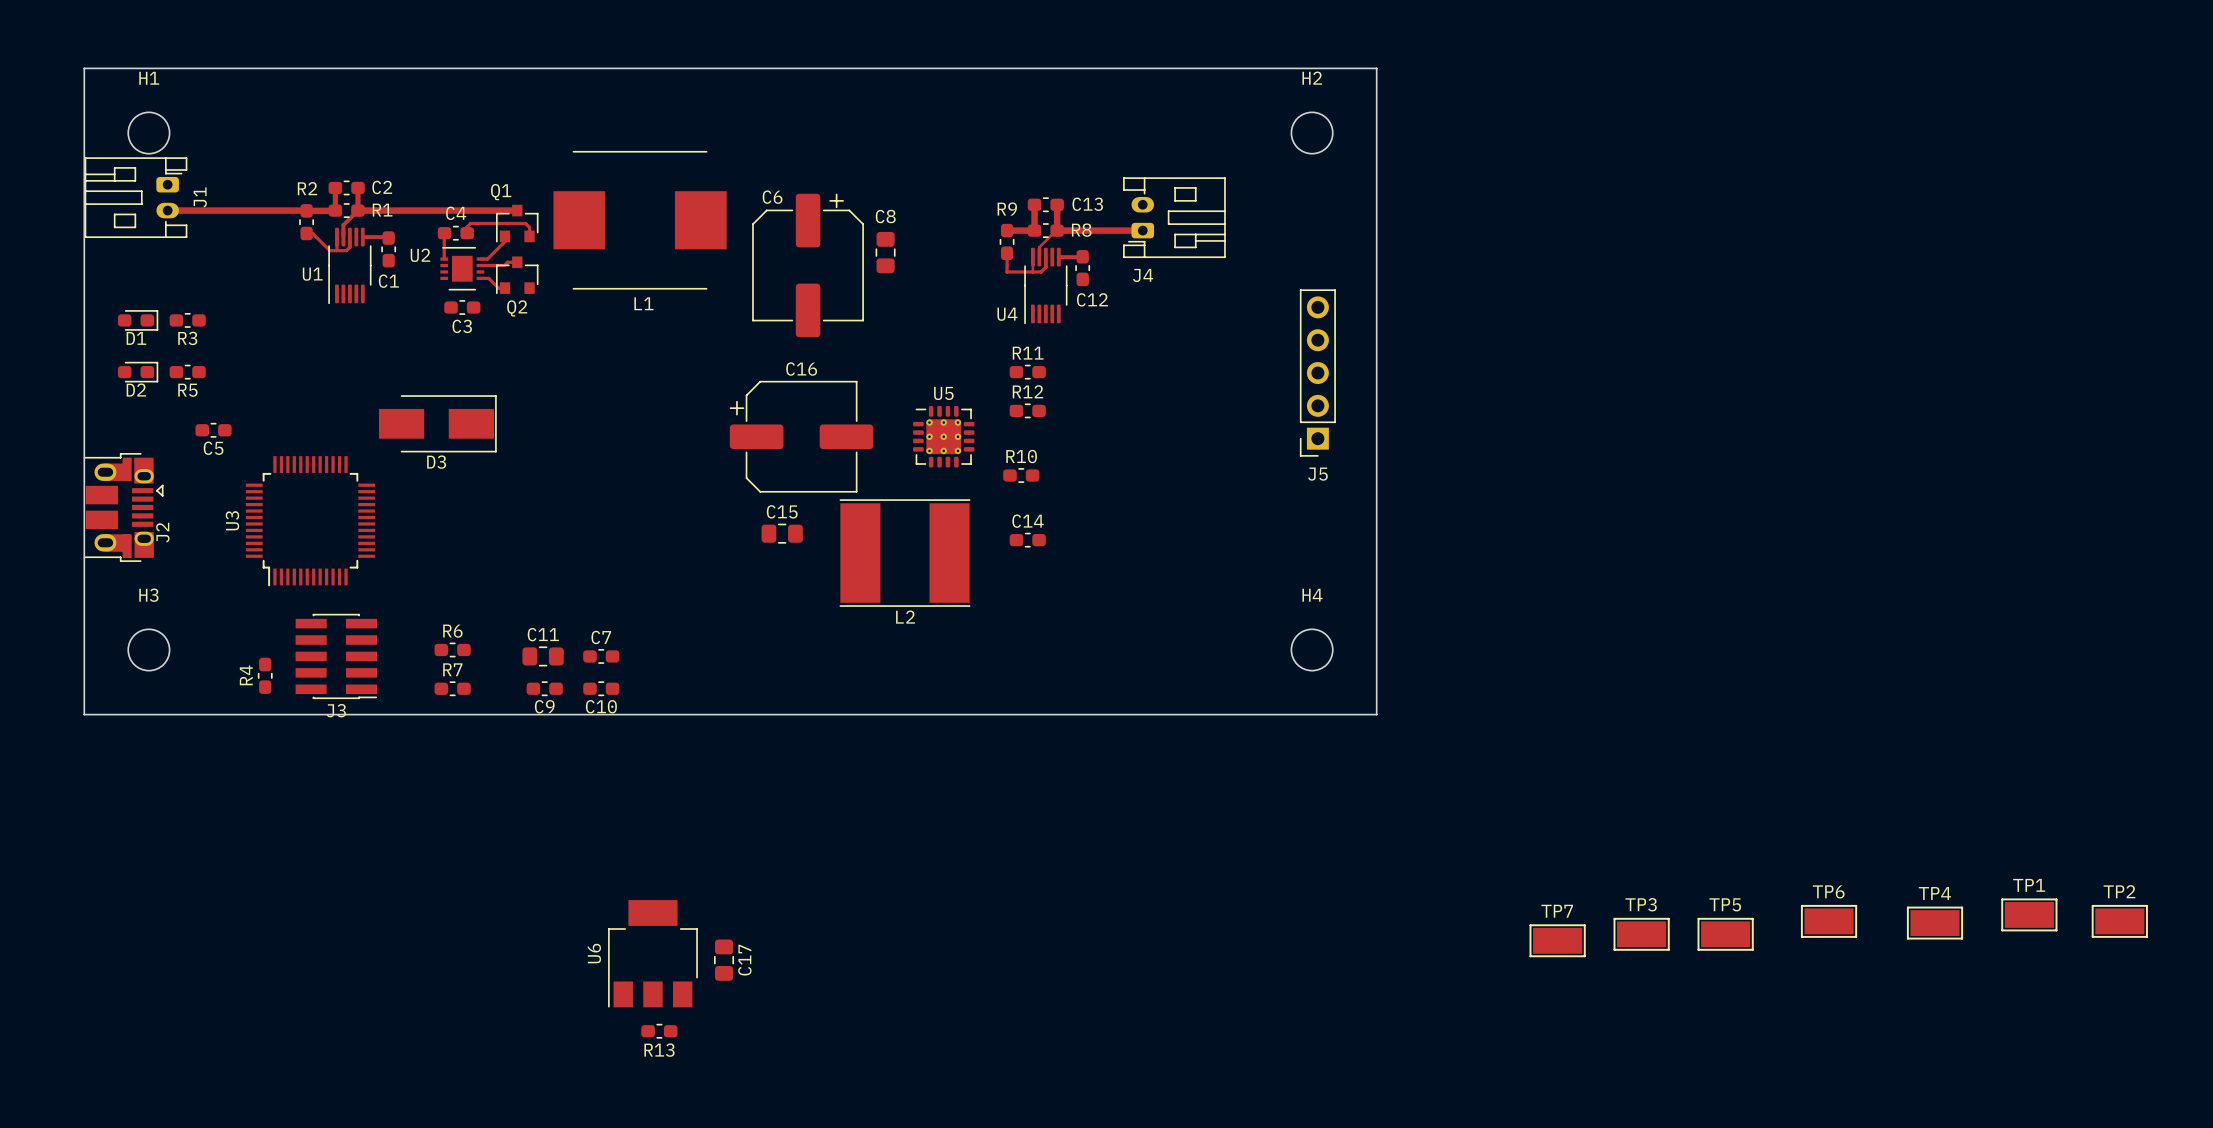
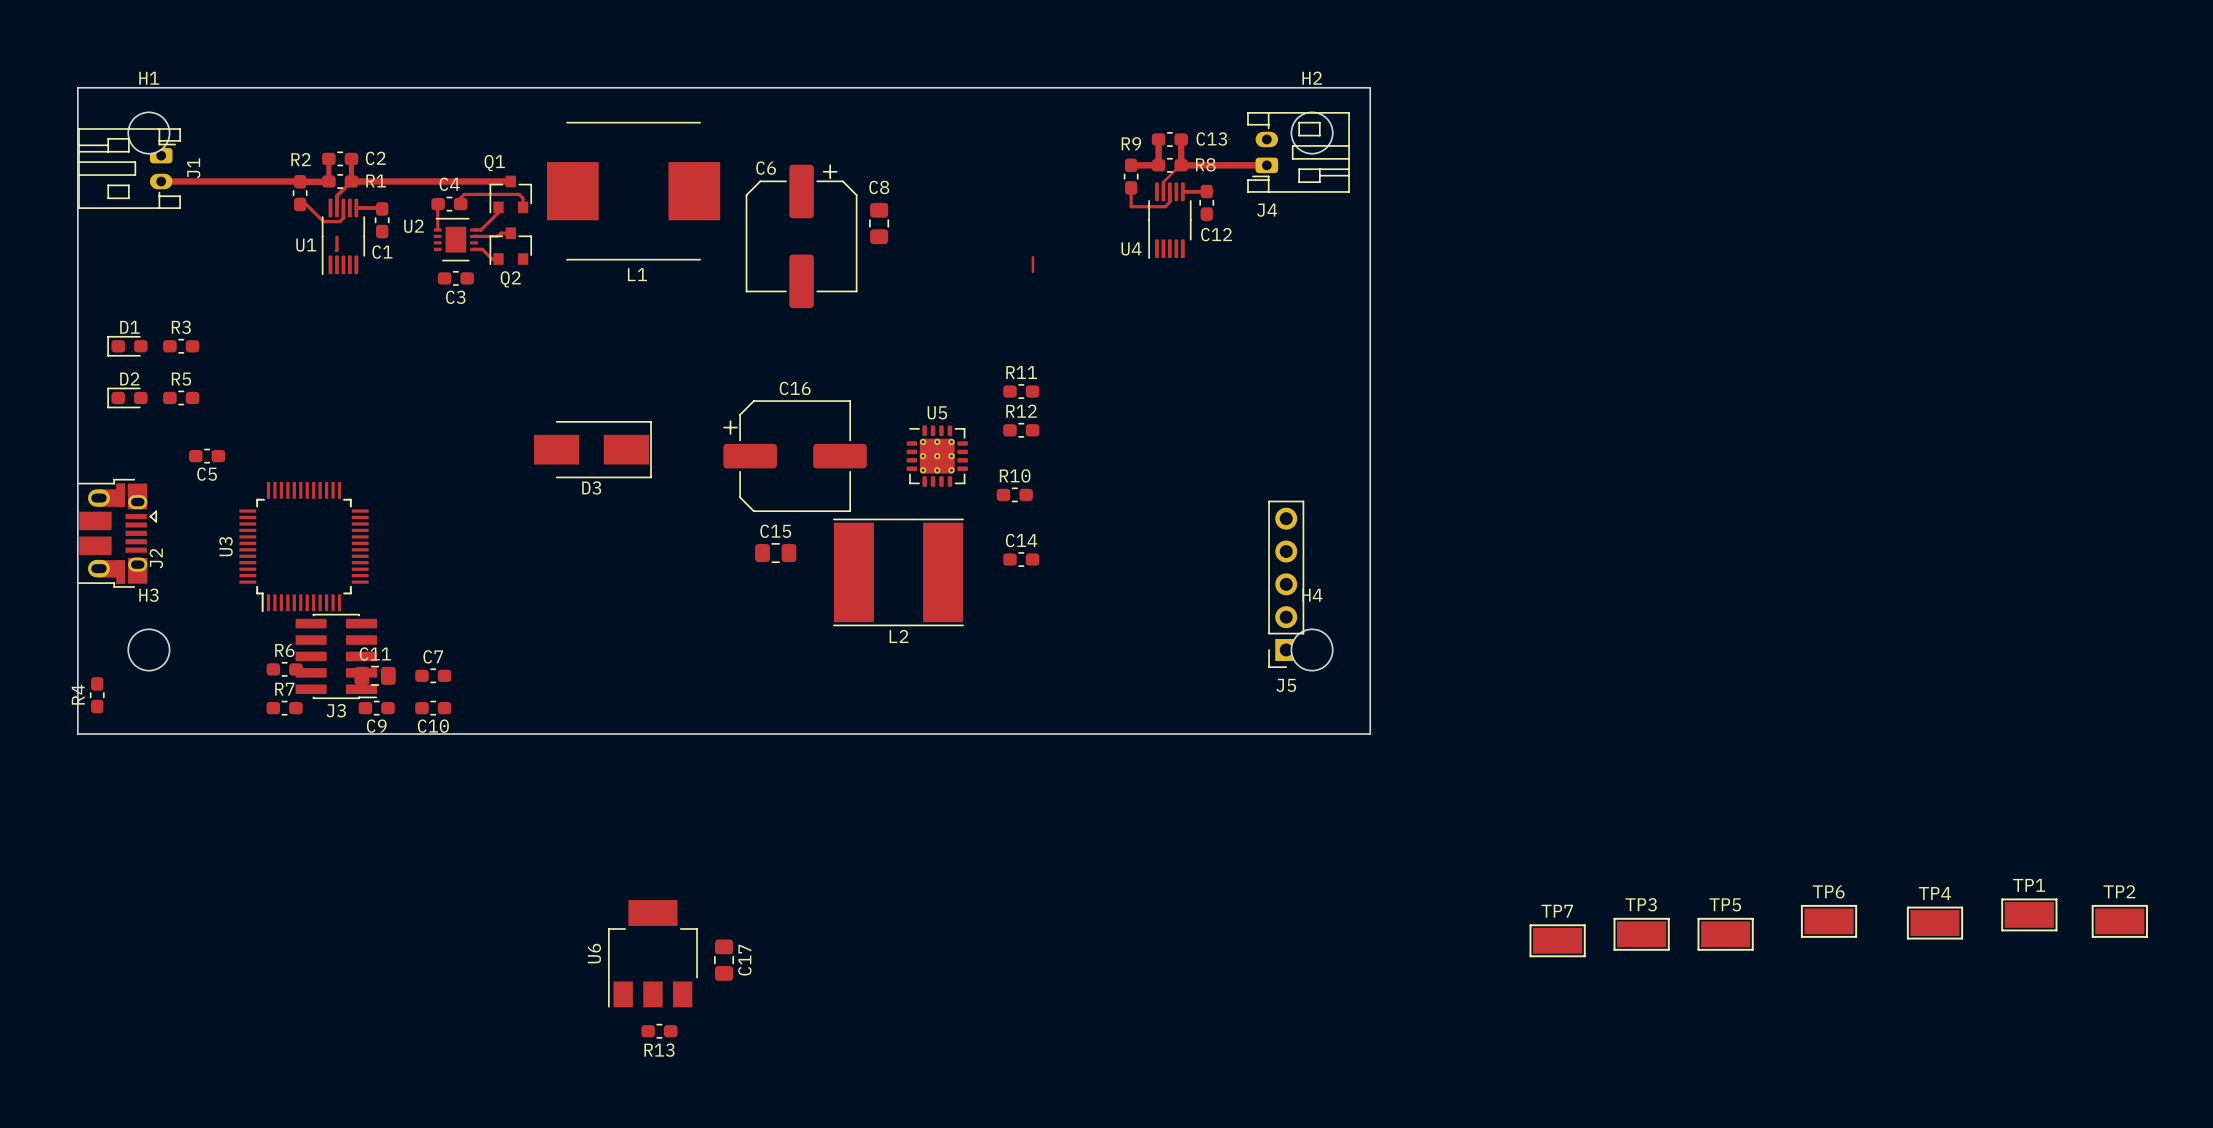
board edge: (84, 68) (1376, 68) (1376, 714) (84, 714) (84, 68) -> (77, 87) (1370, 87) (1370, 733) (77, 733) (77, 87)
track: (335, 187) (335, 210) (167, 210) -> (328, 158) (328, 181) (161, 181)
C2 position: (346, 187) -> (340, 158)
track: (357, 187) (357, 210) -> (351, 158) (351, 181)
J1 position: (135, 197) -> (129, 168)
track: (1034, 204) (1034, 230) (1007, 230) -> (1158, 139) (1158, 165) (1131, 165)
C13 position: (1045, 204) -> (1169, 139)
track: (1057, 204) (1057, 230) -> (1181, 139) (1181, 165)
R1 position: (346, 210) -> (340, 181)
track: (357, 210) (343, 225) (343, 237) -> (351, 181) (336, 196) (336, 207)
track: (357, 210) (517, 210) -> (351, 181) (510, 181)
J4 position: (1174, 217) -> (1298, 152)
L1 position: (640, 220) -> (633, 191)
R2 position: (306, 222) -> (300, 193)
Q1 position: (517, 223) -> (510, 194)
R8 position: (1045, 230) -> (1169, 165)
track: (1057, 230) (1039, 247) (1039, 257) -> (1181, 165) (1163, 182) (1163, 191)
track: (1057, 230) (1142, 230) -> (1181, 165) (1266, 165)
track: (306, 233) (312, 233) (329, 250) (346, 250) (349, 247) (349, 237) -> (300, 204) (306, 204) (323, 221) (340, 221) (343, 218) (343, 207)
track: (444, 233) (444, 259) -> (438, 204) (437, 229)
C4 position: (455, 233) -> (449, 204)
track: (467, 233) (467, 227) (470, 223) (525, 223) (529, 227) (529, 236) -> (460, 204) (460, 197) (464, 194) (519, 194) (523, 198) (523, 207)
track: (504, 236) (504, 241) (487, 259) (480, 259) -> (498, 207) (498, 212) (481, 229) (473, 229)
track: (362, 237) (388, 238) -> (356, 207) (382, 208)
R9 position: (1007, 241) -> (1131, 176)
C1 position: (388, 249) -> (382, 220)
C8 position: (885, 252) -> (879, 223)
track: (1007, 253) (1007, 271) (1041, 271) (1045, 267) (1045, 257) -> (1131, 187) (1131, 206) (1165, 206) (1169, 202) (1169, 191)
track: (1082, 256) (1058, 257) -> (1206, 191) (1182, 191)
track: (517, 262) (507, 262) (504, 265) (480, 265) -> (510, 233) (501, 233) (497, 236) (473, 236)
U1 position: (349, 265) -> (343, 236)
C6 position: (808, 265) -> (801, 236)
U2 position: (462, 268) -> (455, 239)
C12 position: (1082, 268) -> (1206, 202)
Q2 position: (517, 275) -> (510, 246)
track: (480, 278) (488, 278) (498, 288) (504, 288) -> (473, 249) (482, 249) (492, 259) (498, 259)
U4 position: (1045, 285) -> (1169, 220)
C3 position: (462, 307) -> (455, 278)
D1 rotation: 0° (138, 320) -> 180° (127, 346)
D1 position: (138, 320) -> (127, 346)
R3 position: (187, 320) -> (181, 346)
R3 name position: R3 (187, 338) -> R3 (181, 327)
D2 rotation: 0° (138, 372) -> 180° (127, 397)
D2 position: (138, 372) -> (127, 397)
R5 position: (187, 372) -> (181, 397)
R11 position: (1027, 372) -> (1021, 391)
J5 position: (1317, 373) -> (1286, 584)
R5 name position: R5 (187, 390) -> R5 (181, 379)
R12 position: (1027, 410) -> (1021, 430)
D3 position: (437, 423) -> (592, 449)
C5 position: (213, 430) -> (207, 456)
C16 position: (801, 436) -> (795, 456)
U5 position: (943, 436) -> (937, 456)
R10 position: (1021, 475) -> (1014, 494)
J2 position: (123, 507) -> (117, 533)
U3 position: (310, 521) -> (304, 547)
C15 position: (782, 533) -> (775, 553)
C14 position: (1027, 540) -> (1021, 559)
L2 position: (904, 553) -> (898, 572)
R6 position: (452, 649) -> (284, 669)
C11 position: (543, 656) -> (375, 675)
C7 position: (601, 656) -> (433, 675)
R4 position: (265, 675) -> (97, 695)
R7 position: (452, 688) -> (284, 708)
C9 position: (544, 688) -> (376, 708)
C10 position: (601, 688) -> (433, 708)

